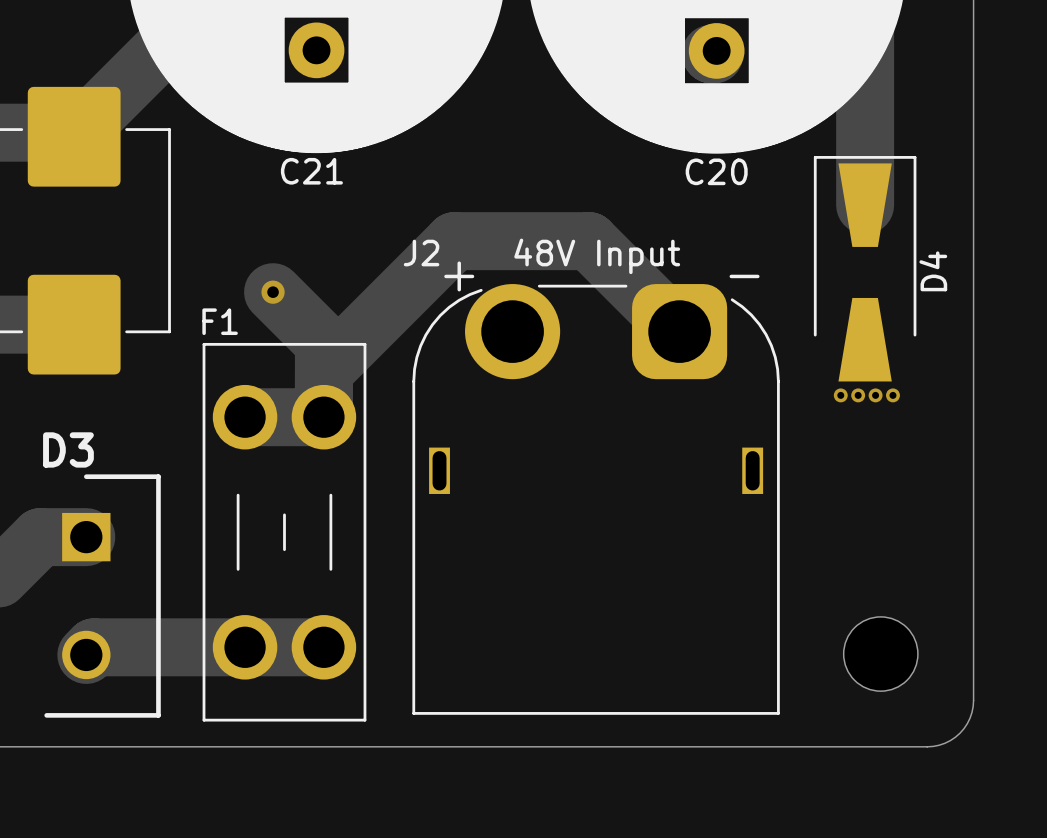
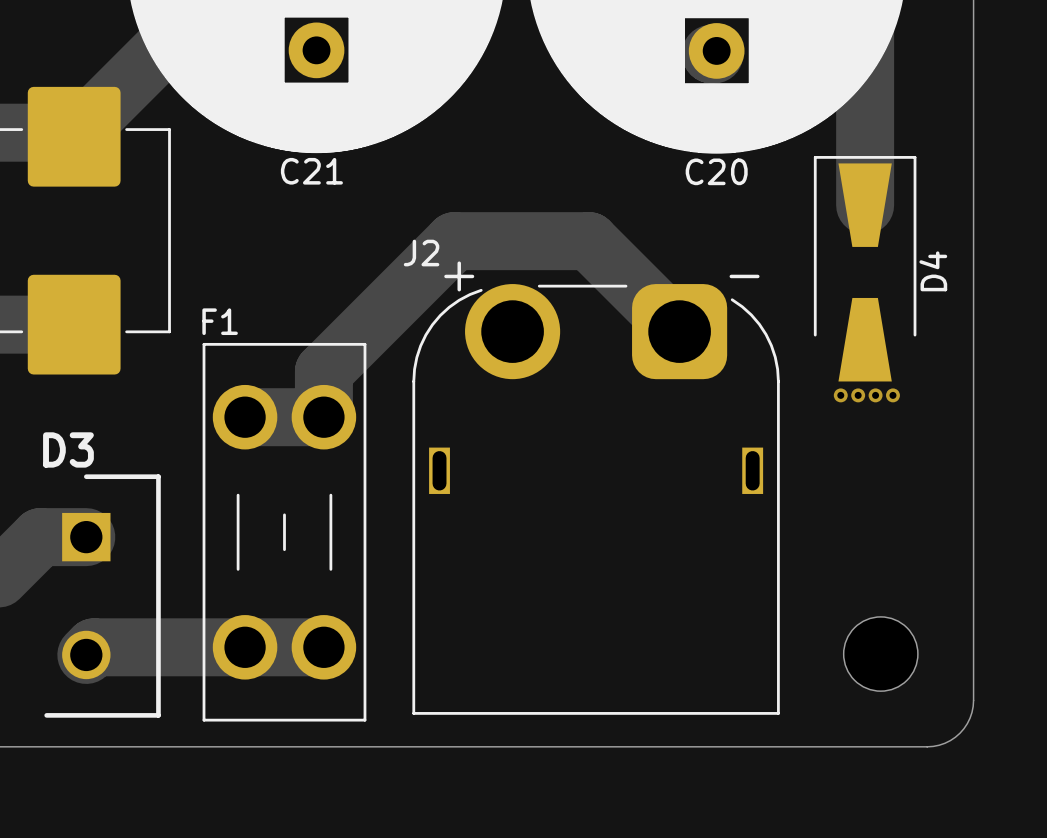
J2 value: 48V Input (597, 256) -> none
track: (273, 292) (323, 343) (323, 371) -> none
via: (273, 292) -> none

